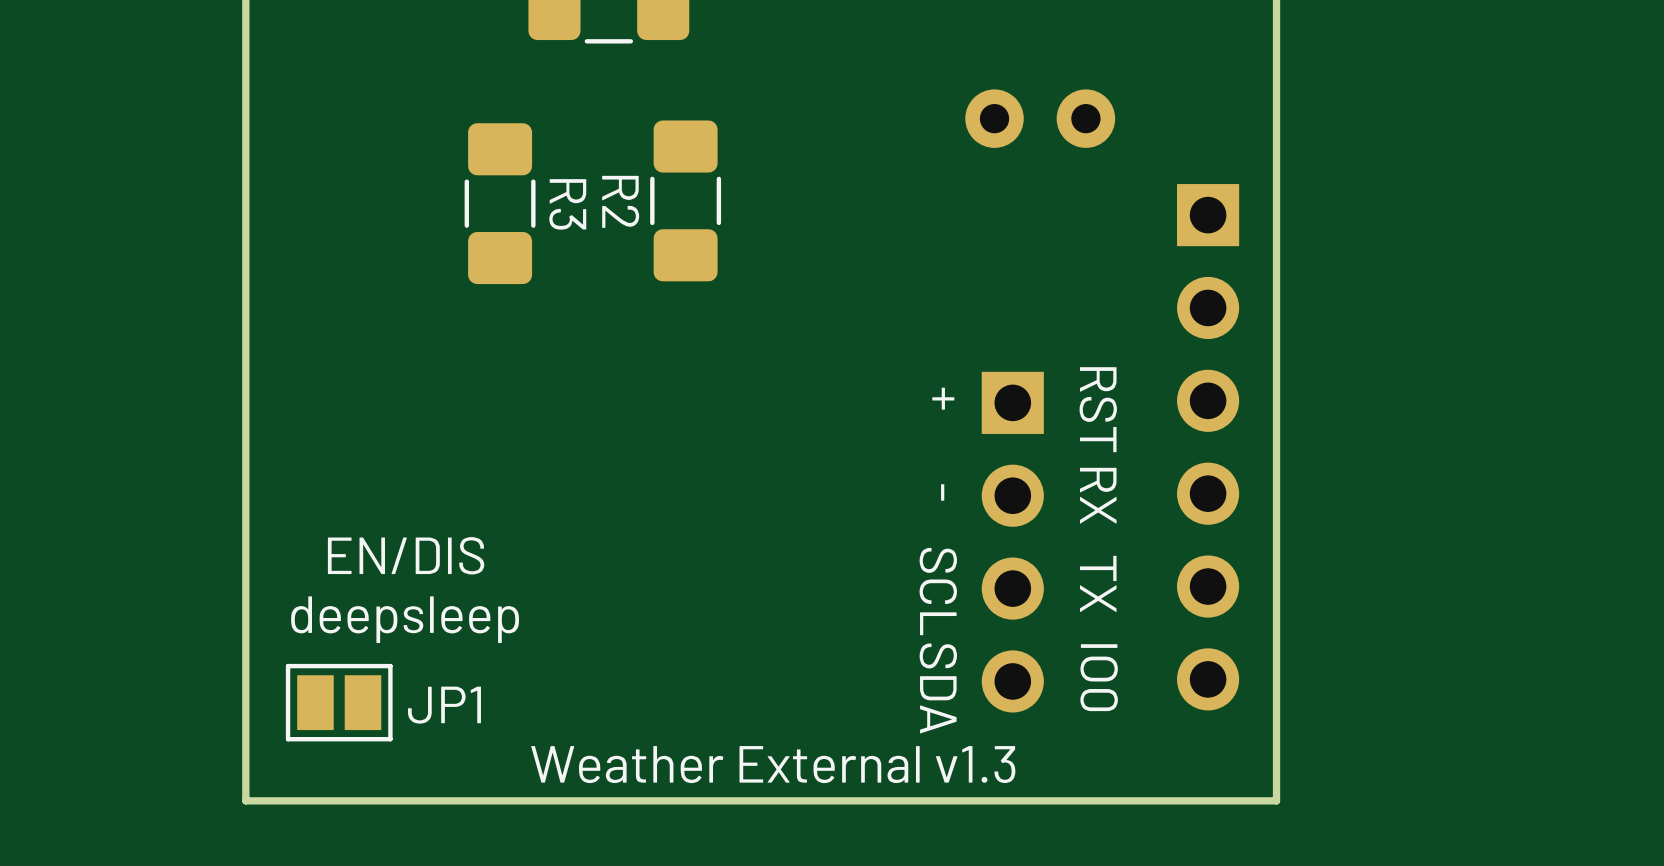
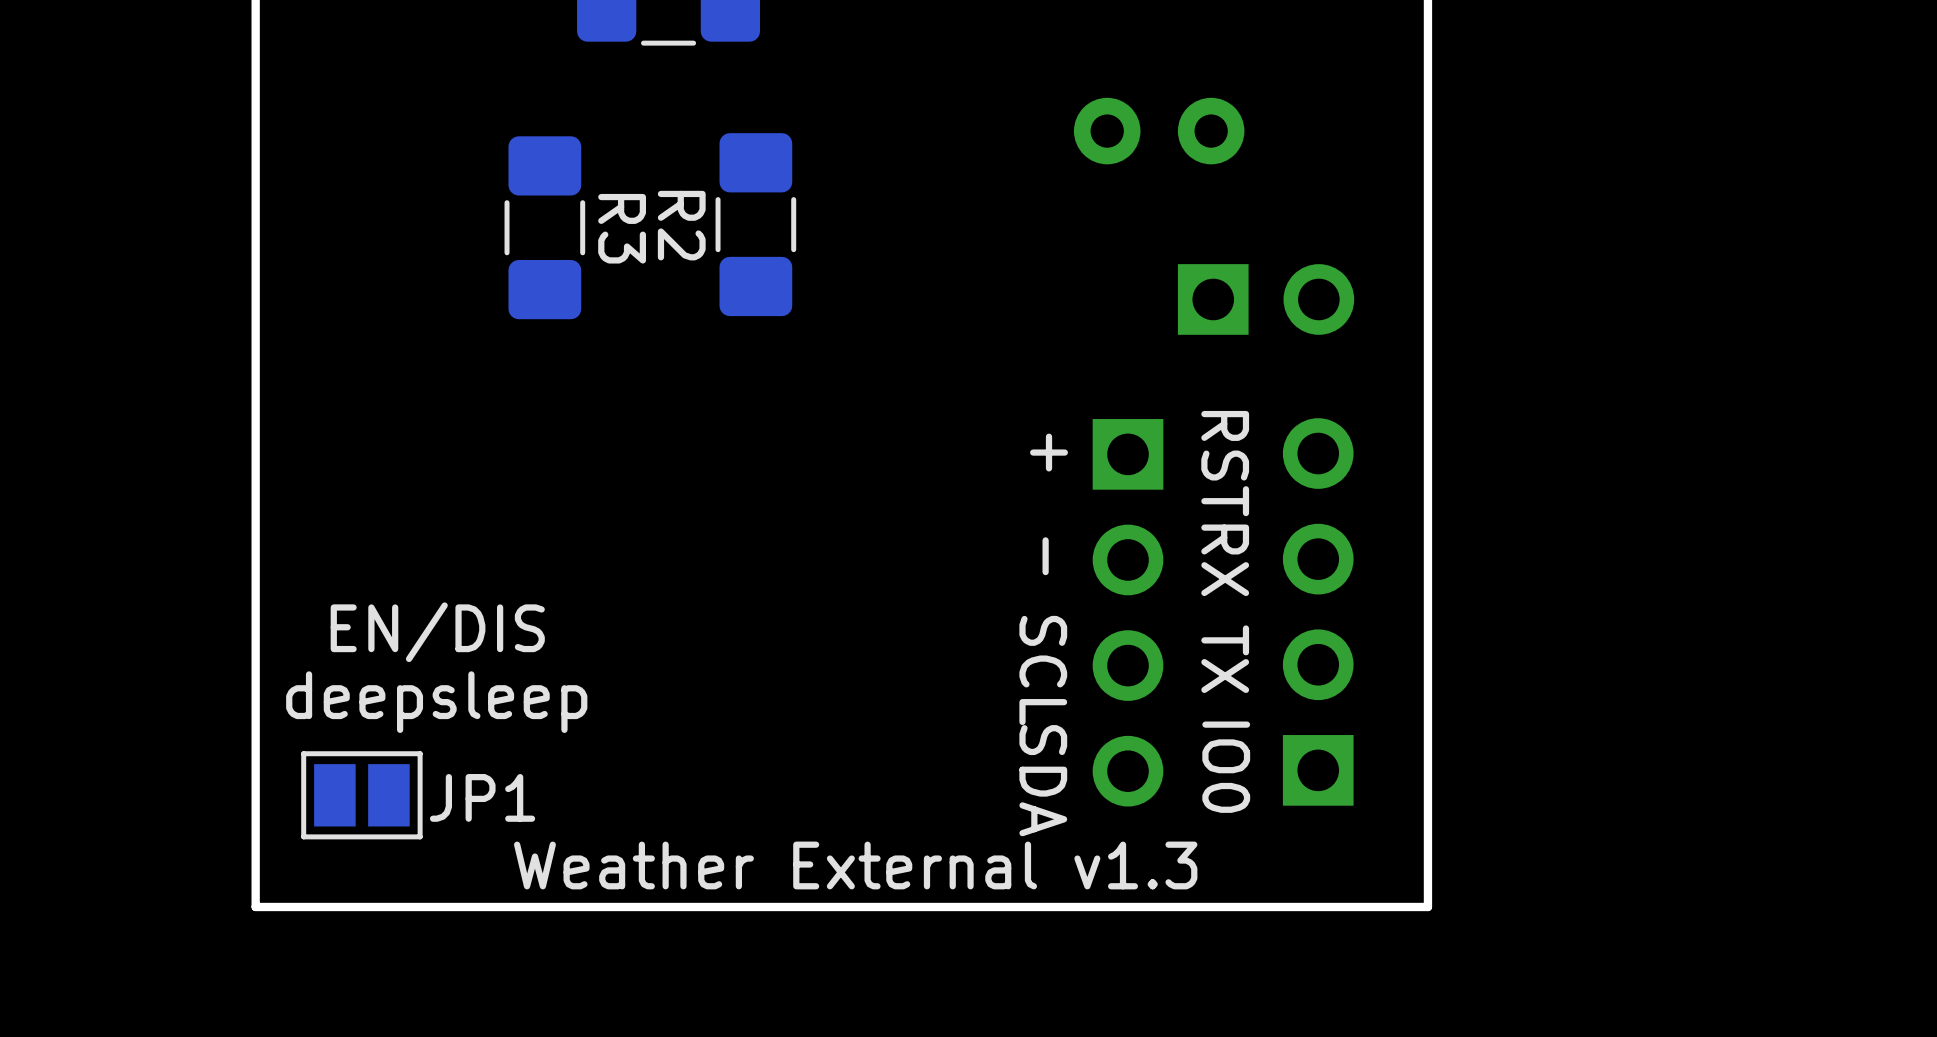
part: none -> (1266, 299)
part: (1208, 447) -> none
part: none -> (1318, 611)

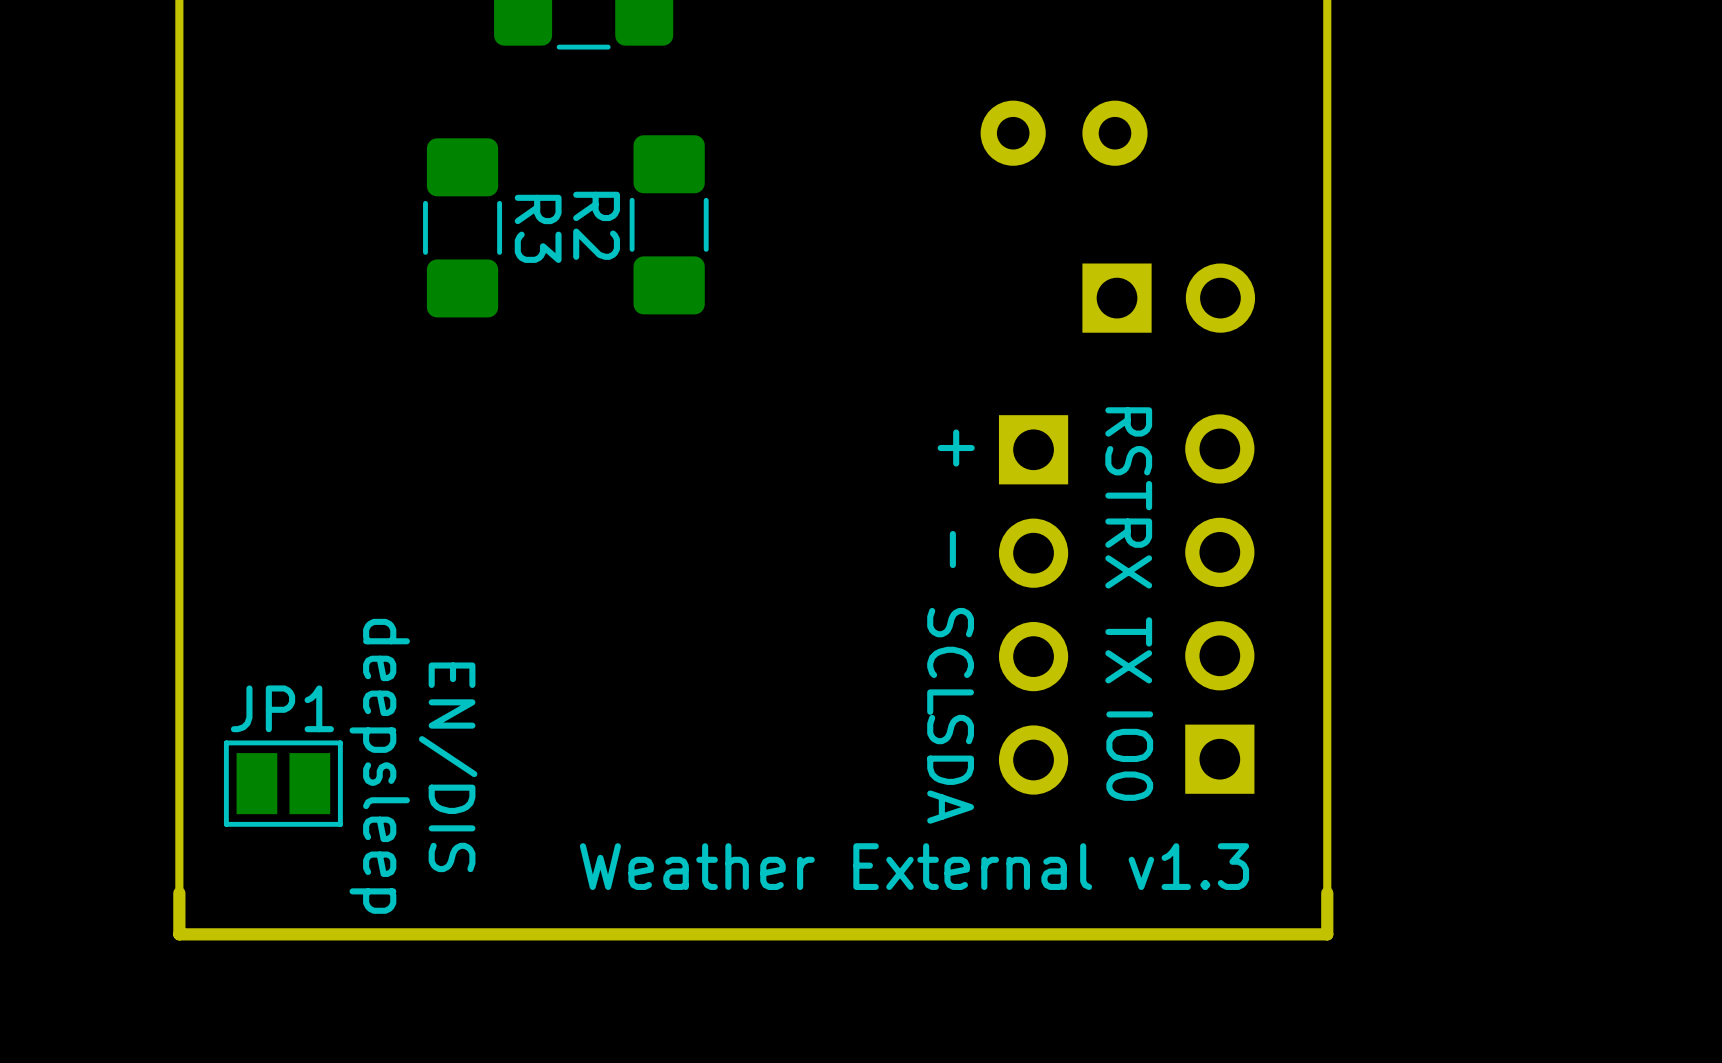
text rotation: 0° (437, 632) -> 90° clockwise (448, 767)
text rotation: 0° (436, 702) -> 90° clockwise (379, 766)
JP1 name position: JP1 (482, 797) -> JP1 (282, 708)
text position: Weather External v1.3 (855, 865) -> Weather External v1.3 (914, 866)
board edge: (1427, 906) (255, 906) -> (1327, 892) (1327, 934) (179, 934) (179, 892)

